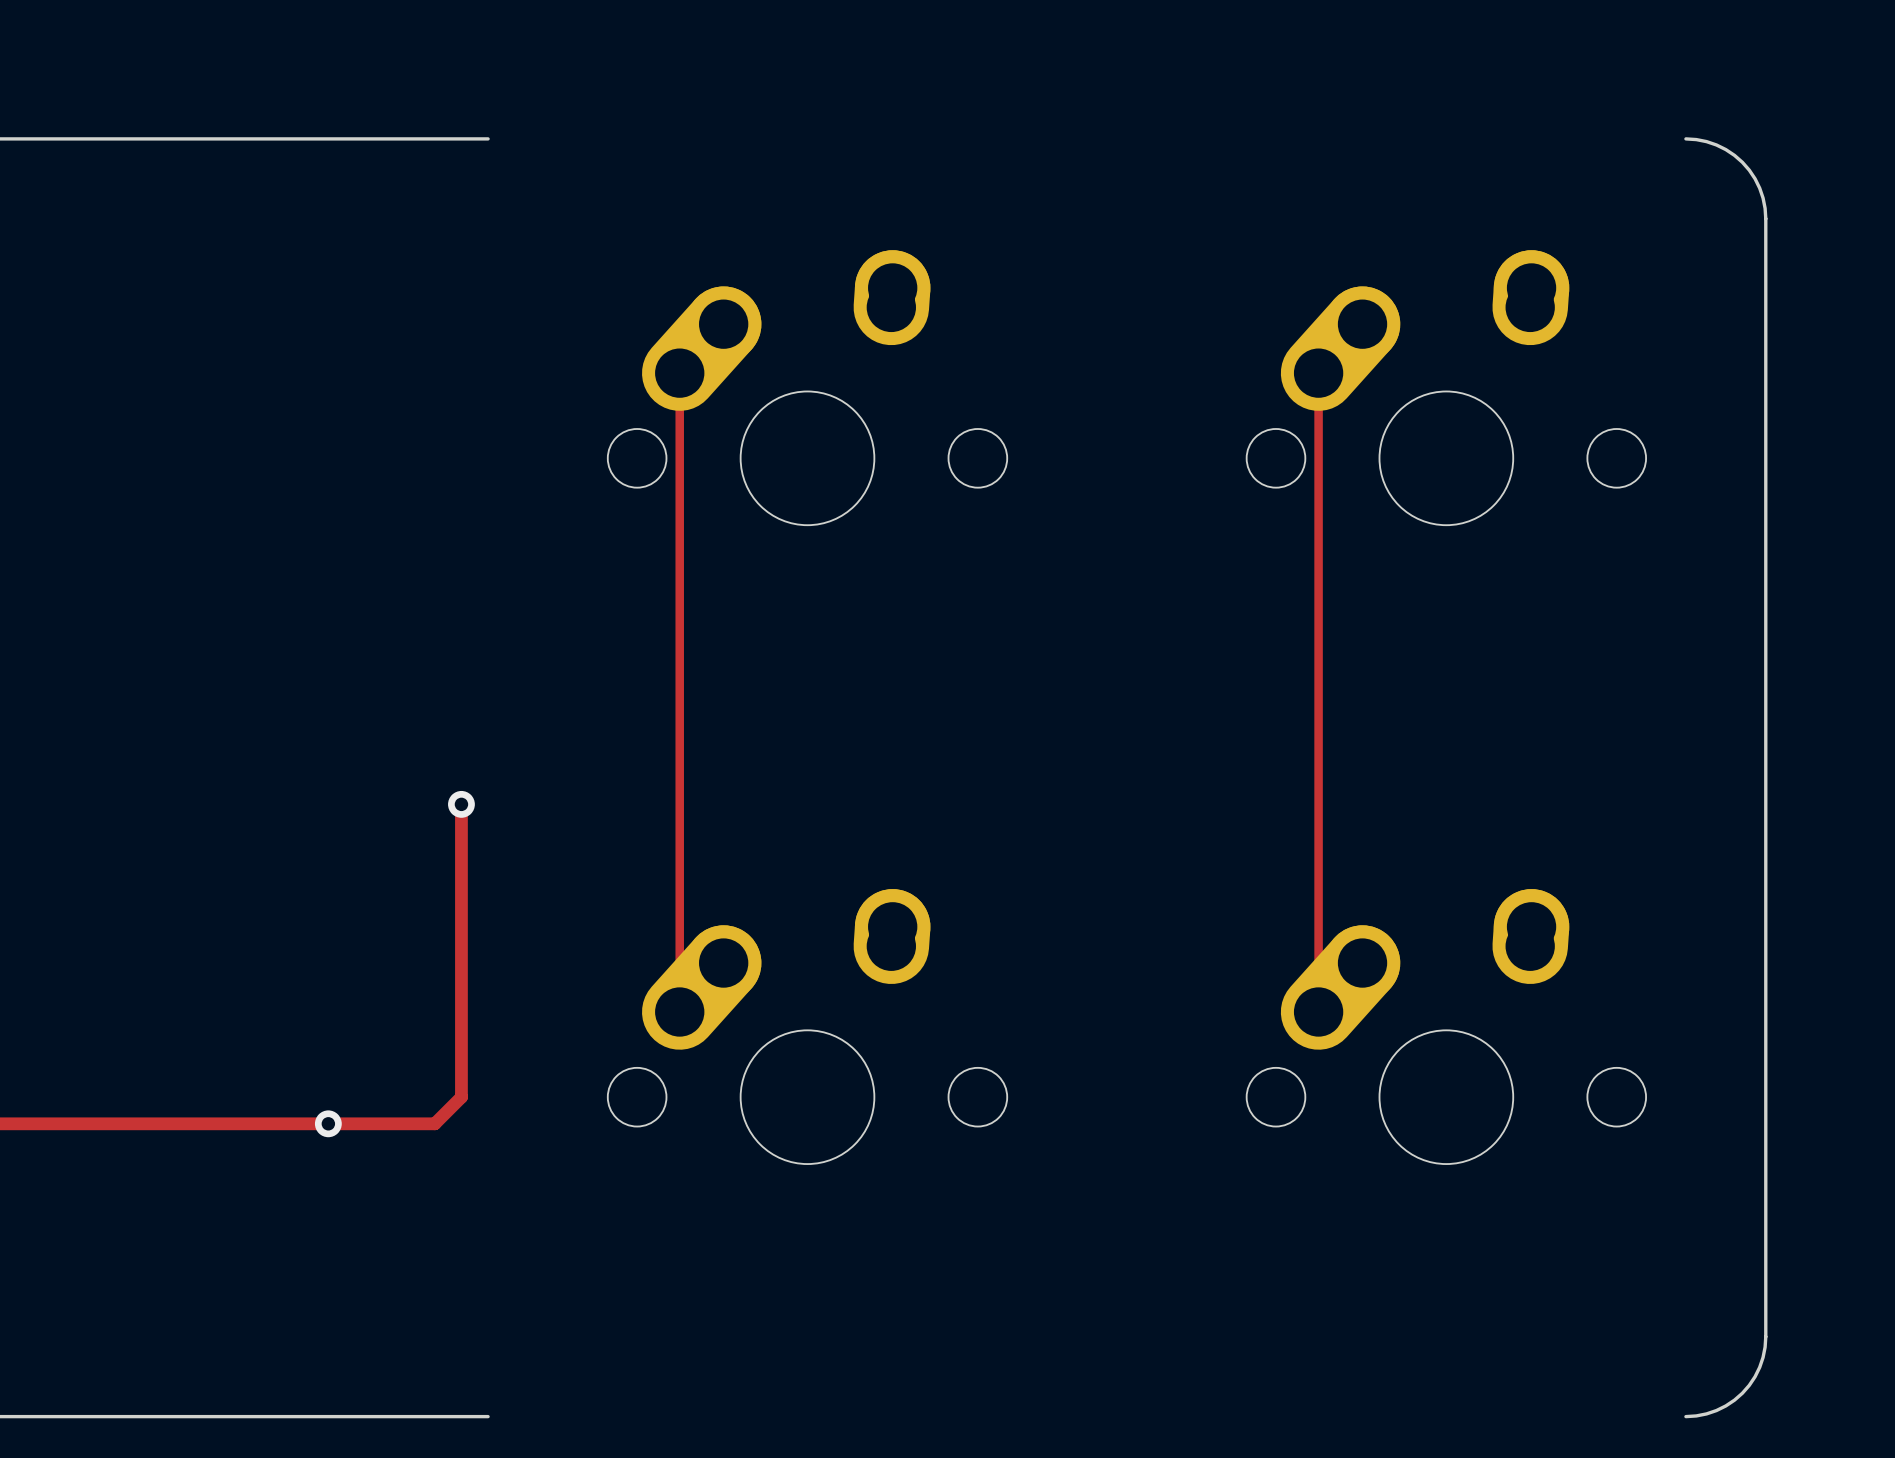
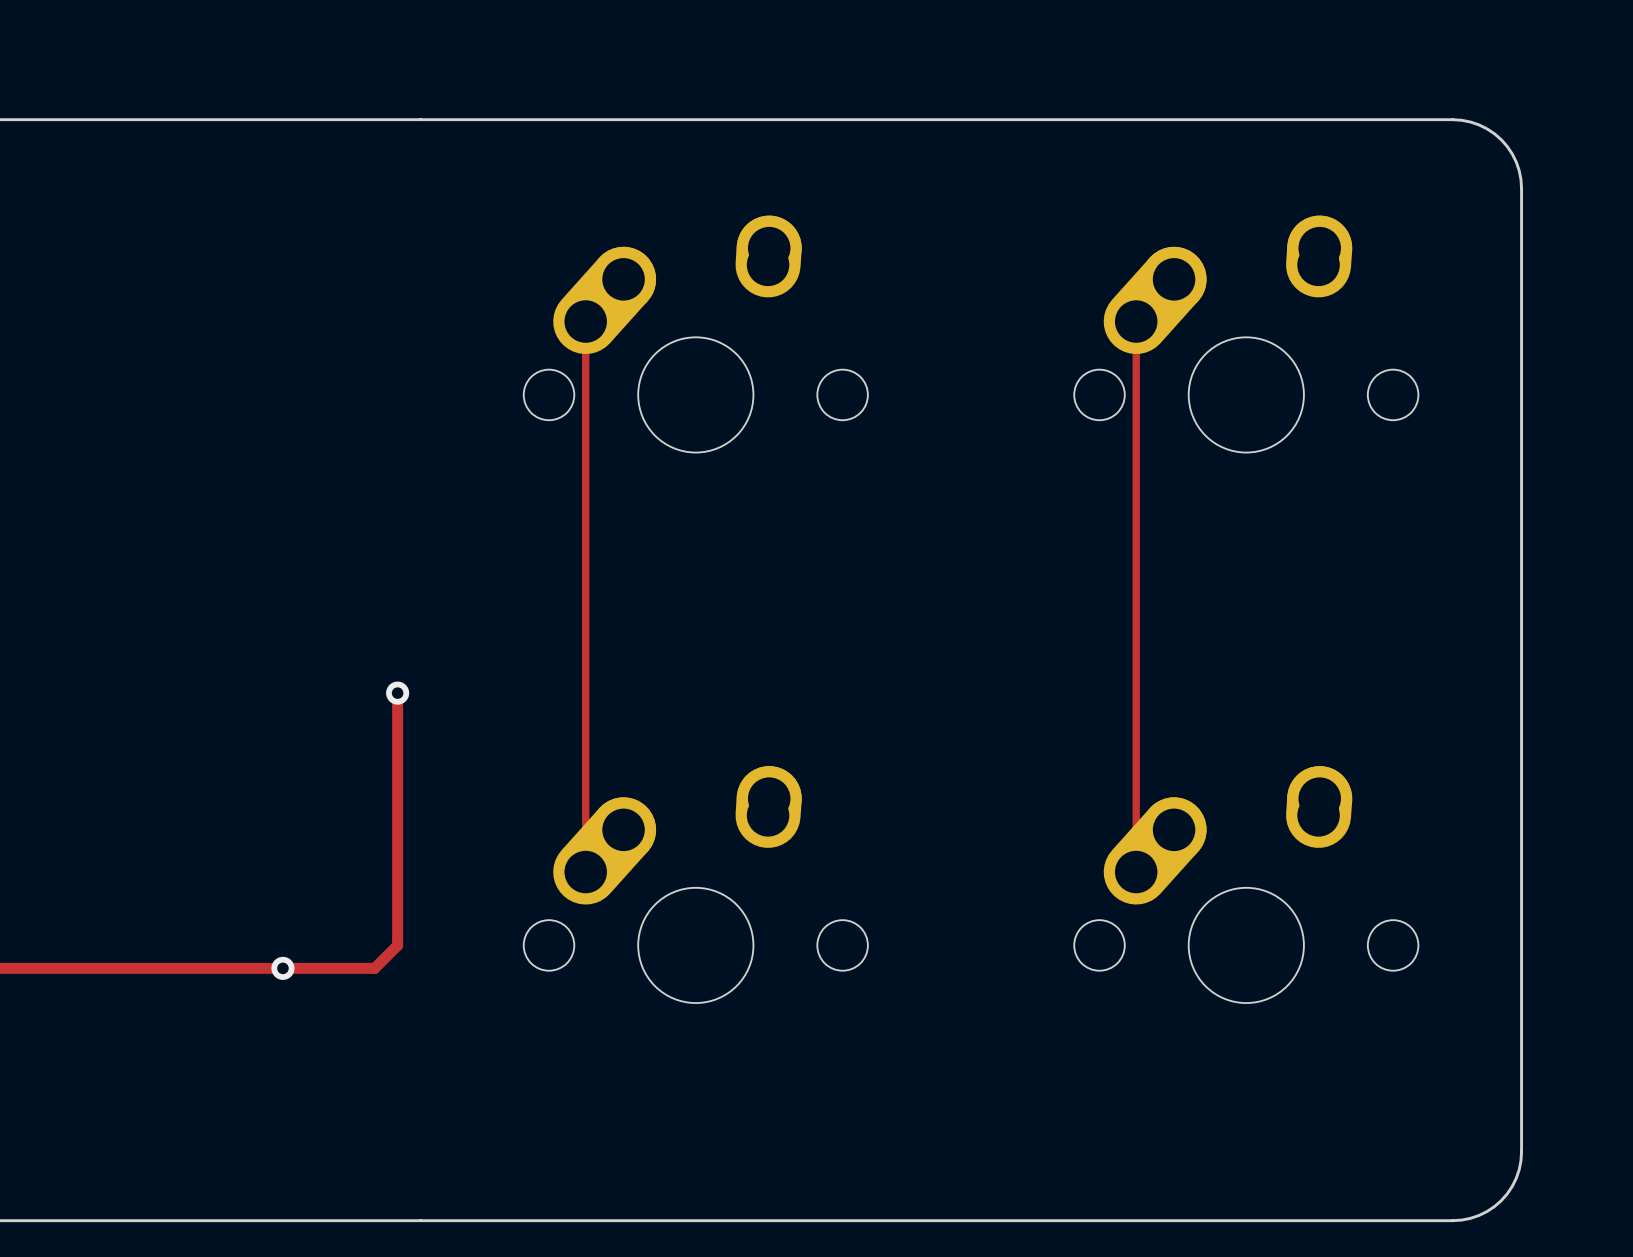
board edge: none -> (420, 119) (1452, 119)
board edge: none -> (420, 1220) (1452, 1220)

